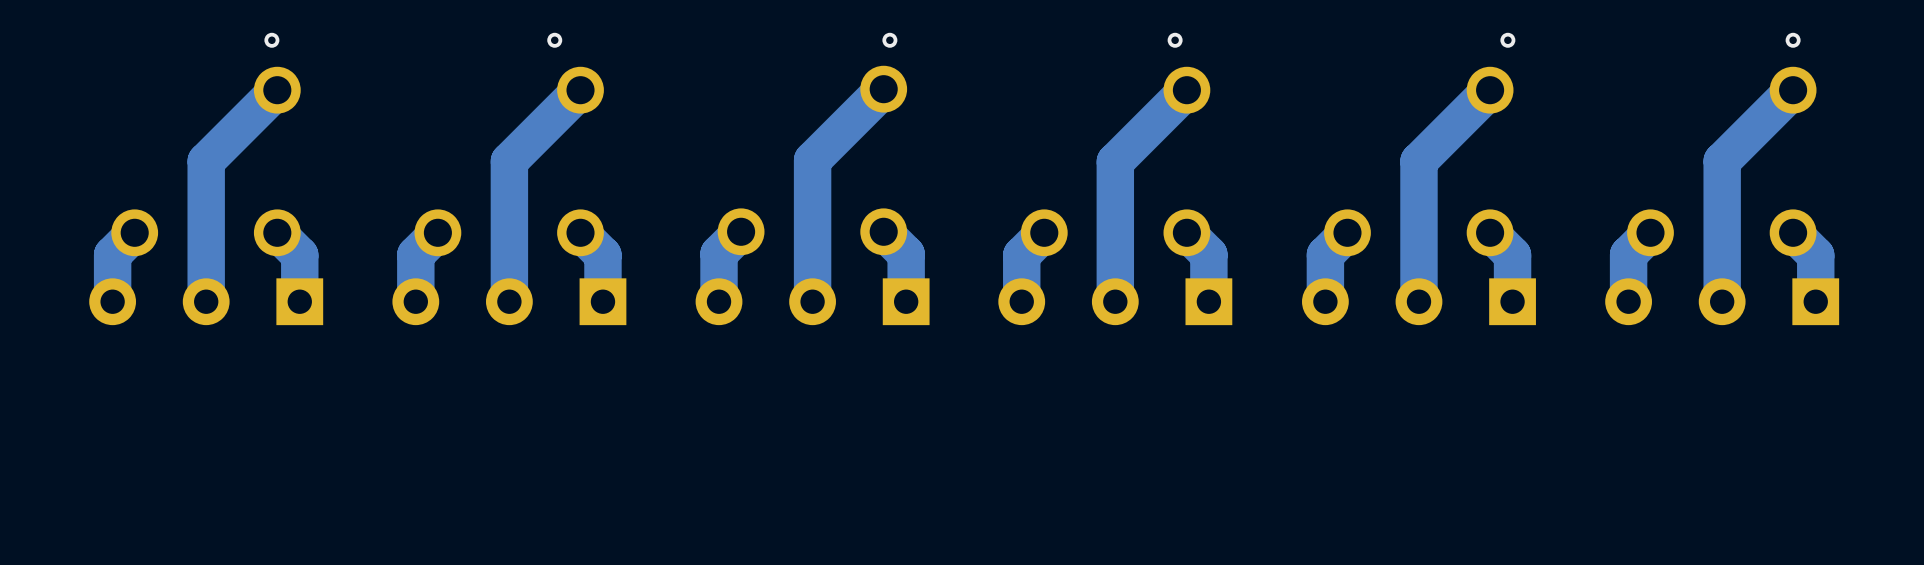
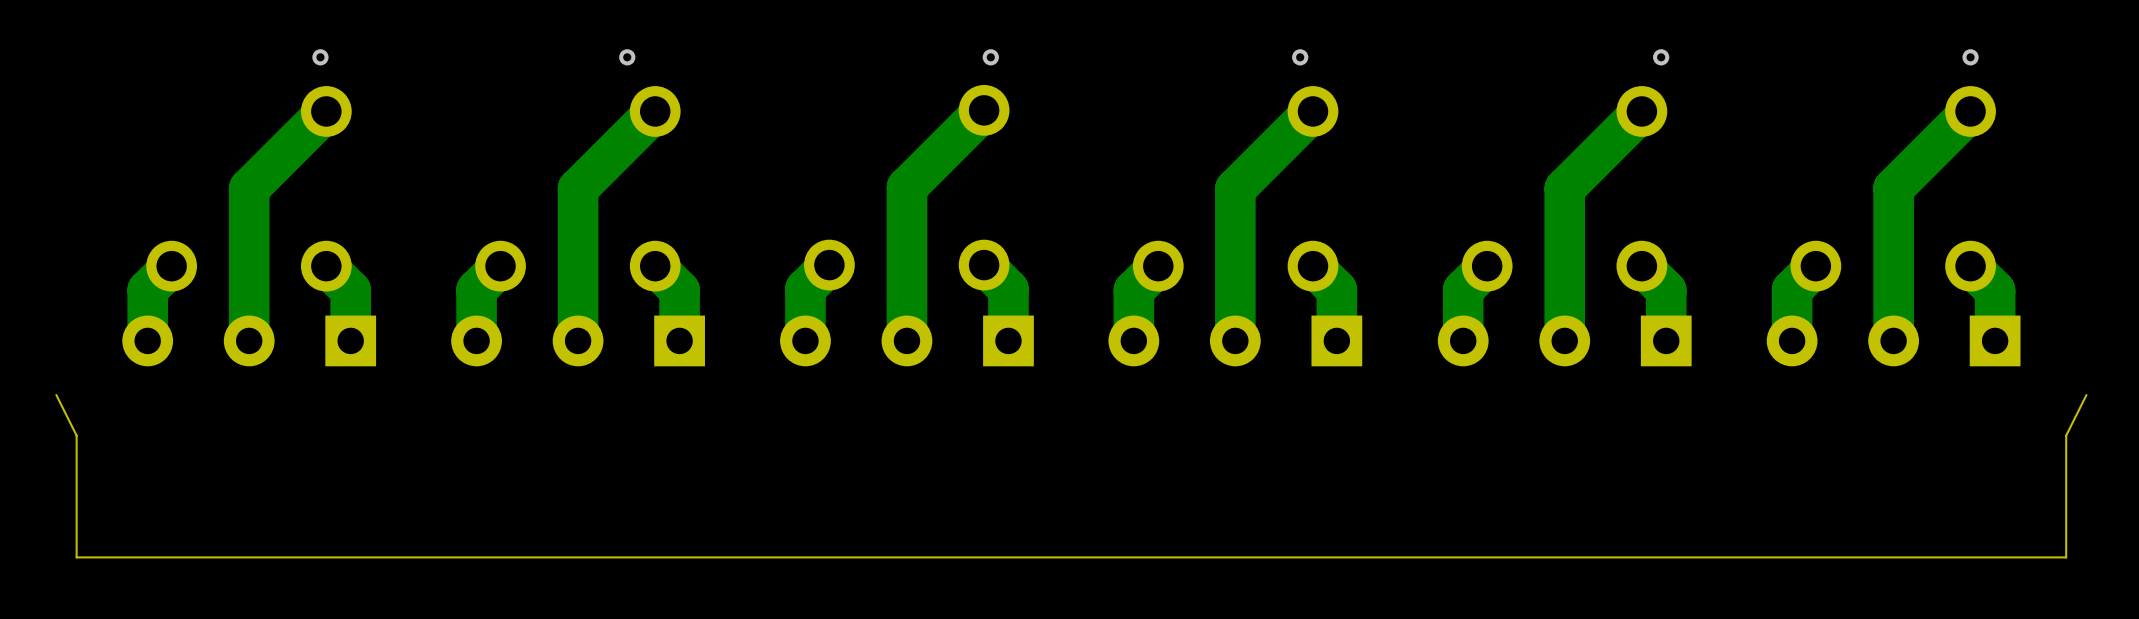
board edge: none -> (2086, 394) (2066, 435) (2066, 557) (76, 557) (76, 435) (56, 394)

